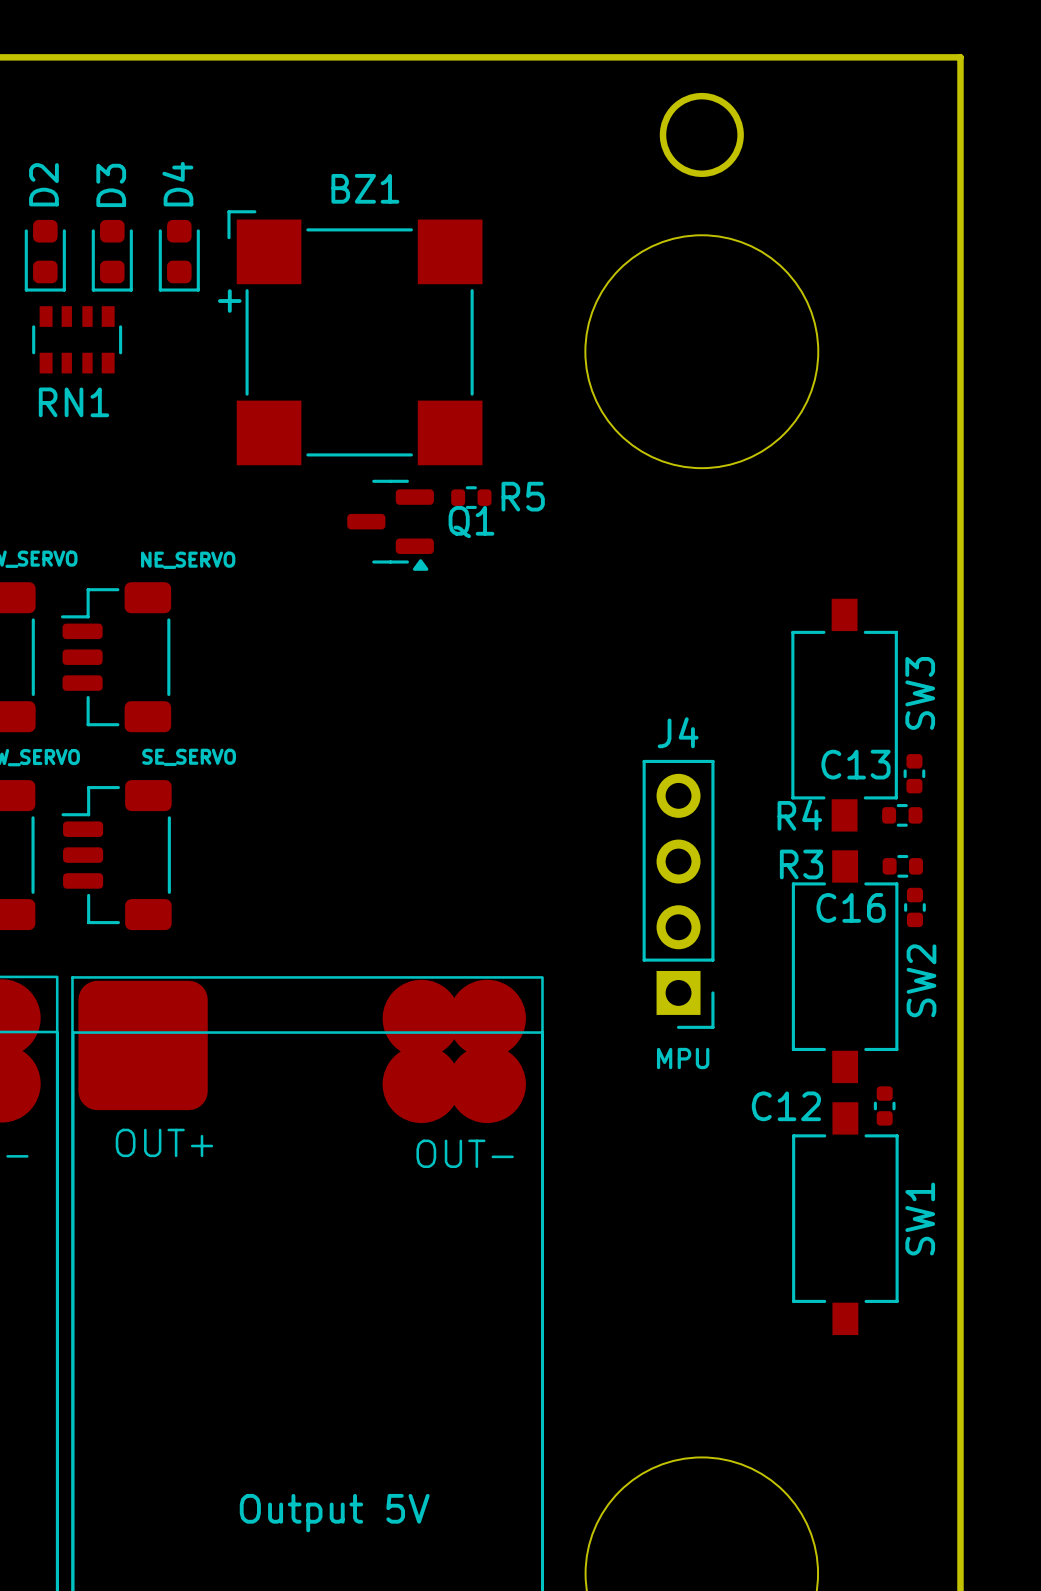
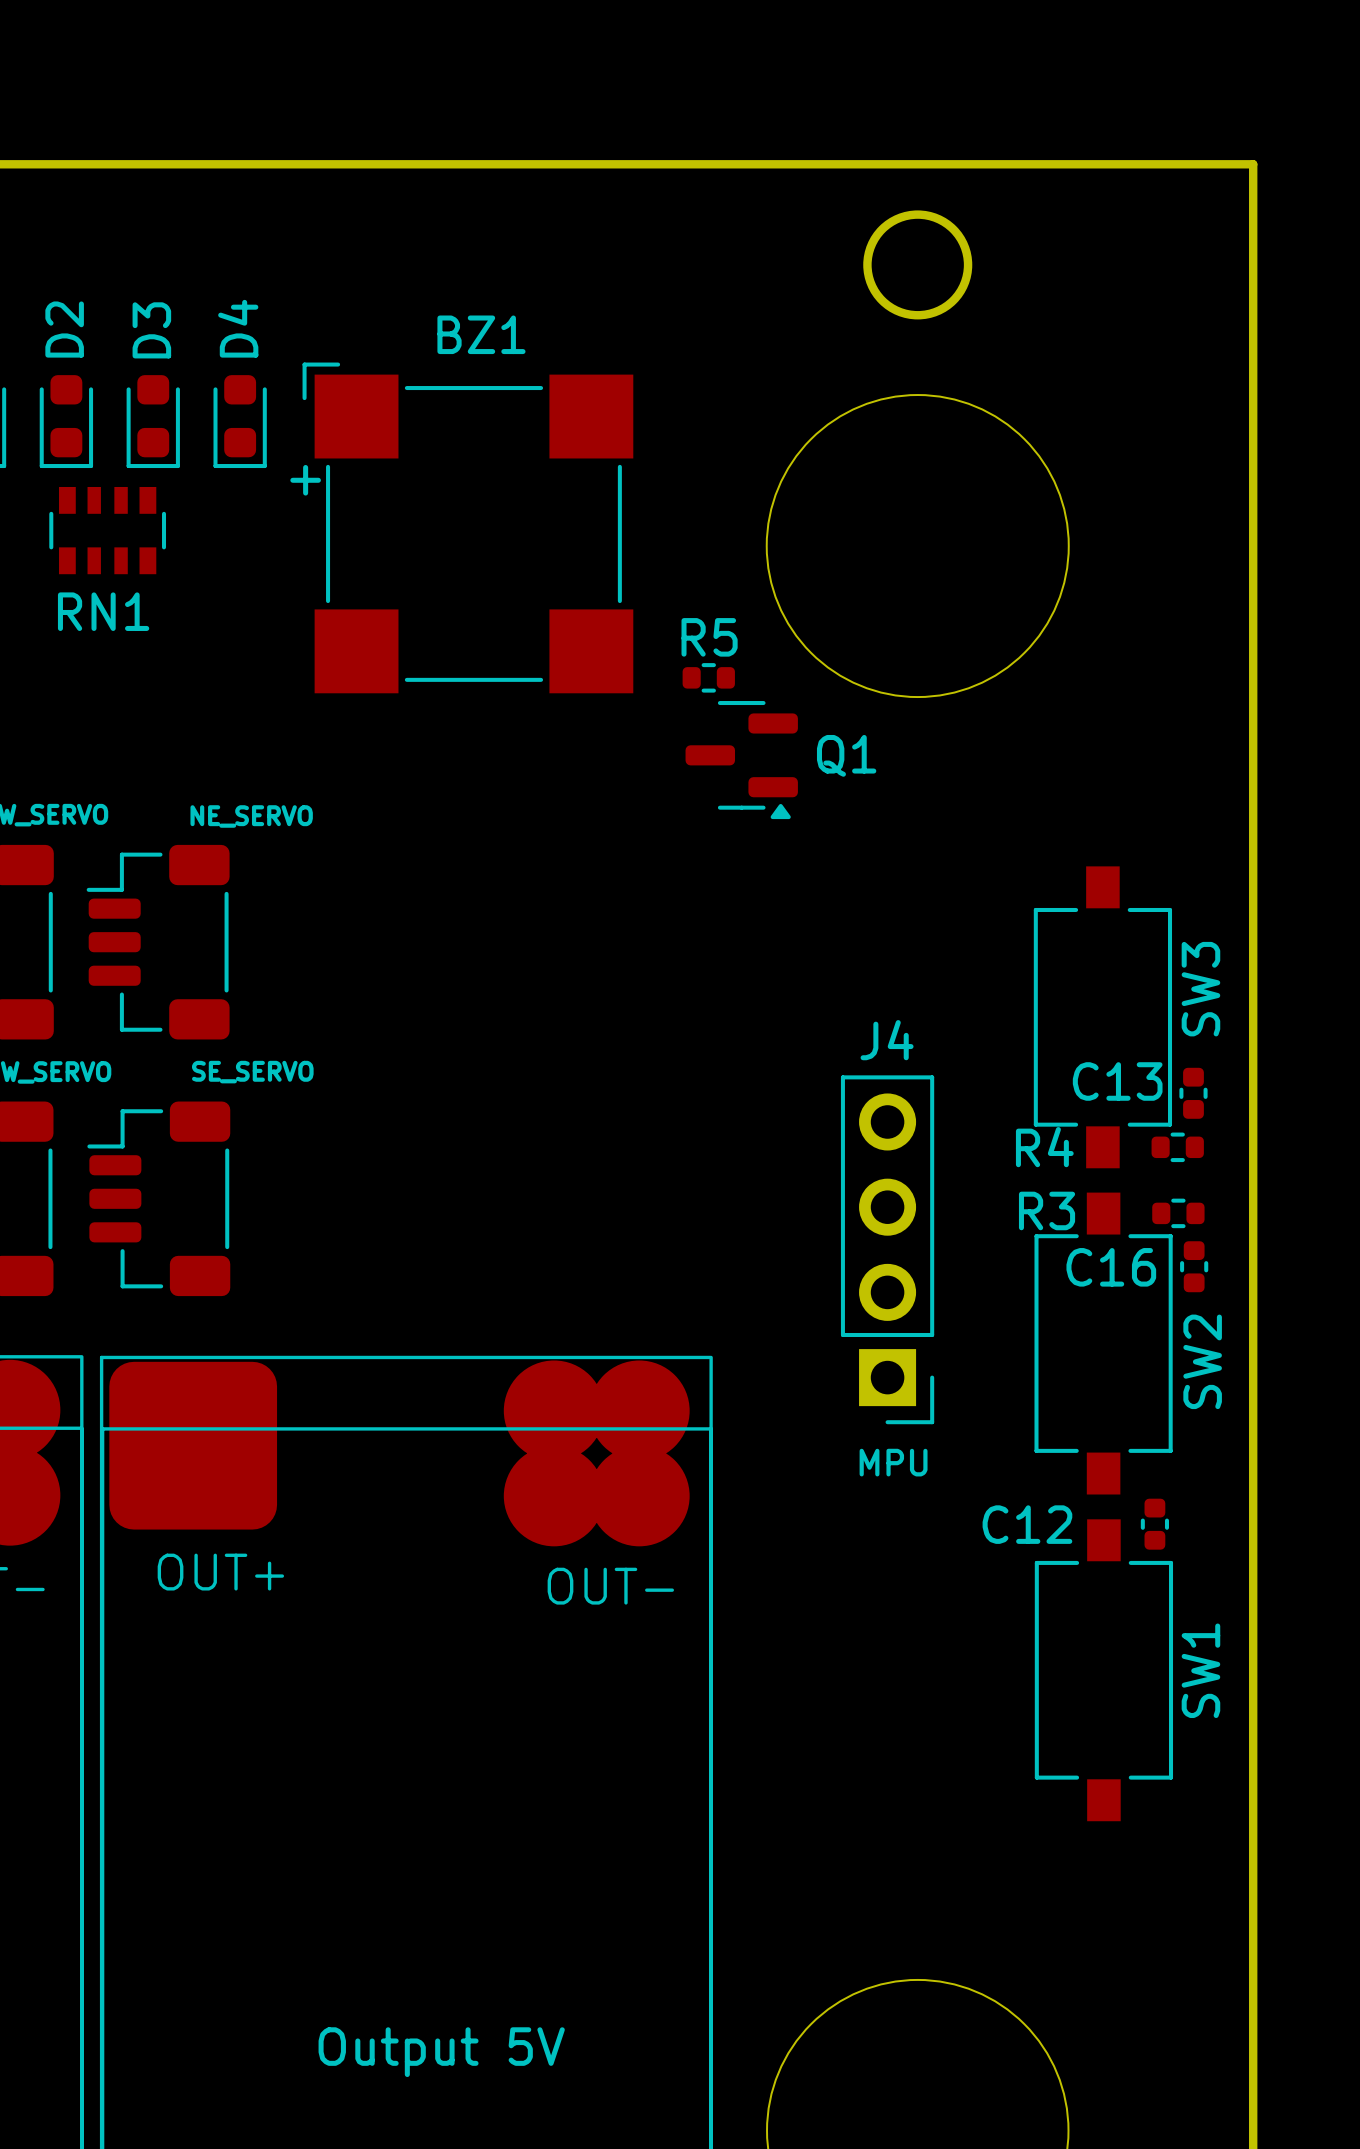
R5 name position: R5 (523, 496) -> R5 (709, 637)
R5 position: (471, 497) -> (708, 677)
Q1 position: (390, 525) -> (741, 760)

